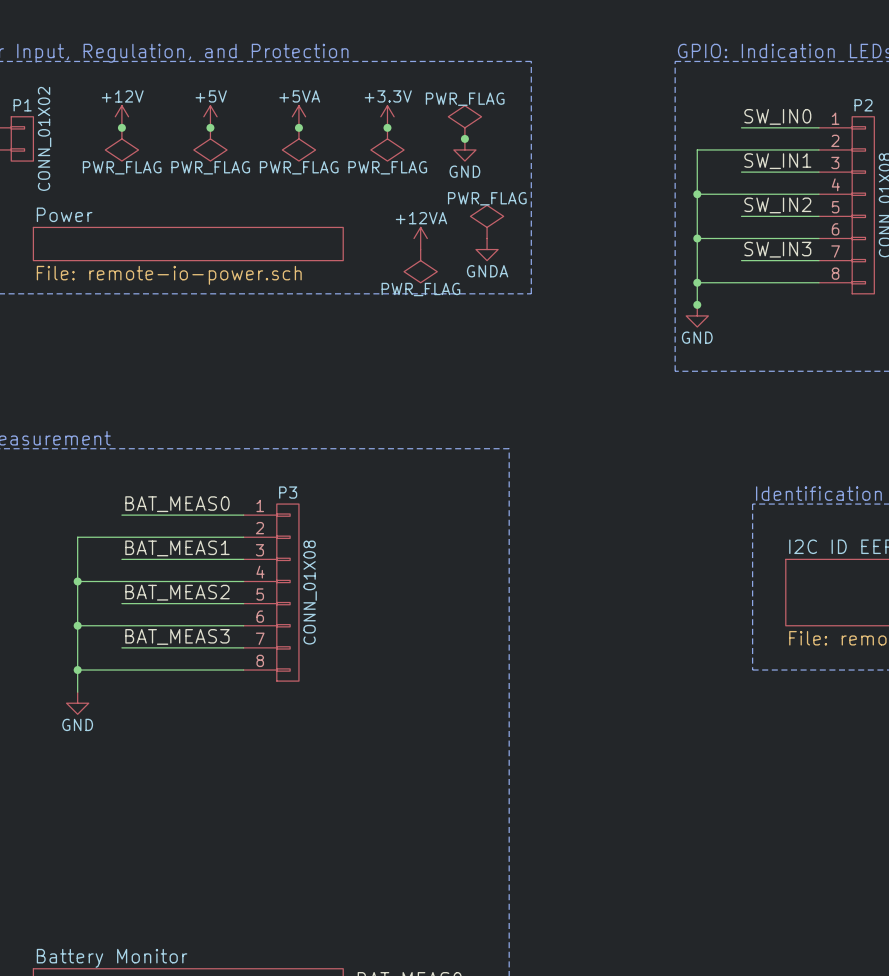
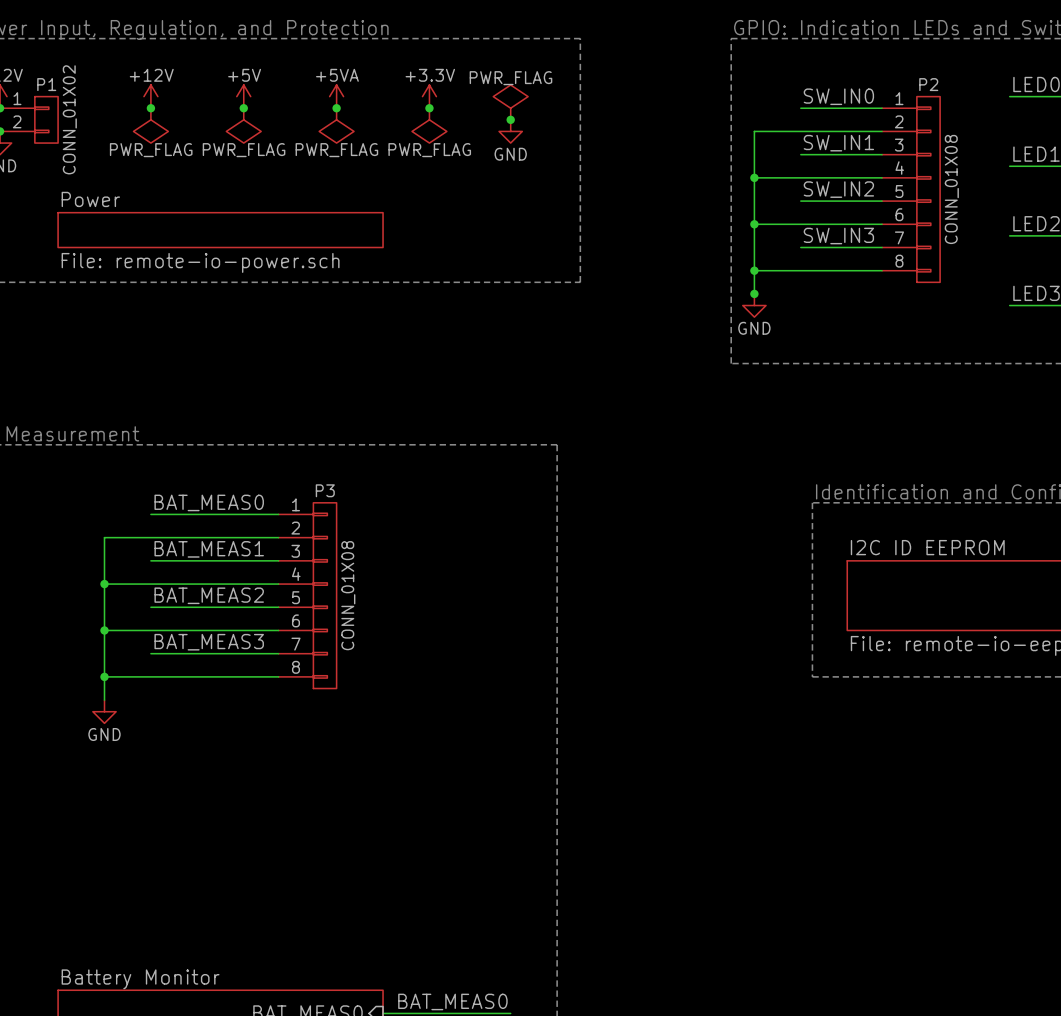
power symbol: PWR_FLAG (487, 221) -> none
power symbol: +12VA (420, 238) -> none
power symbol: GNDA (487, 249) -> none
power symbol: PWR_FLAG (420, 266) -> none

